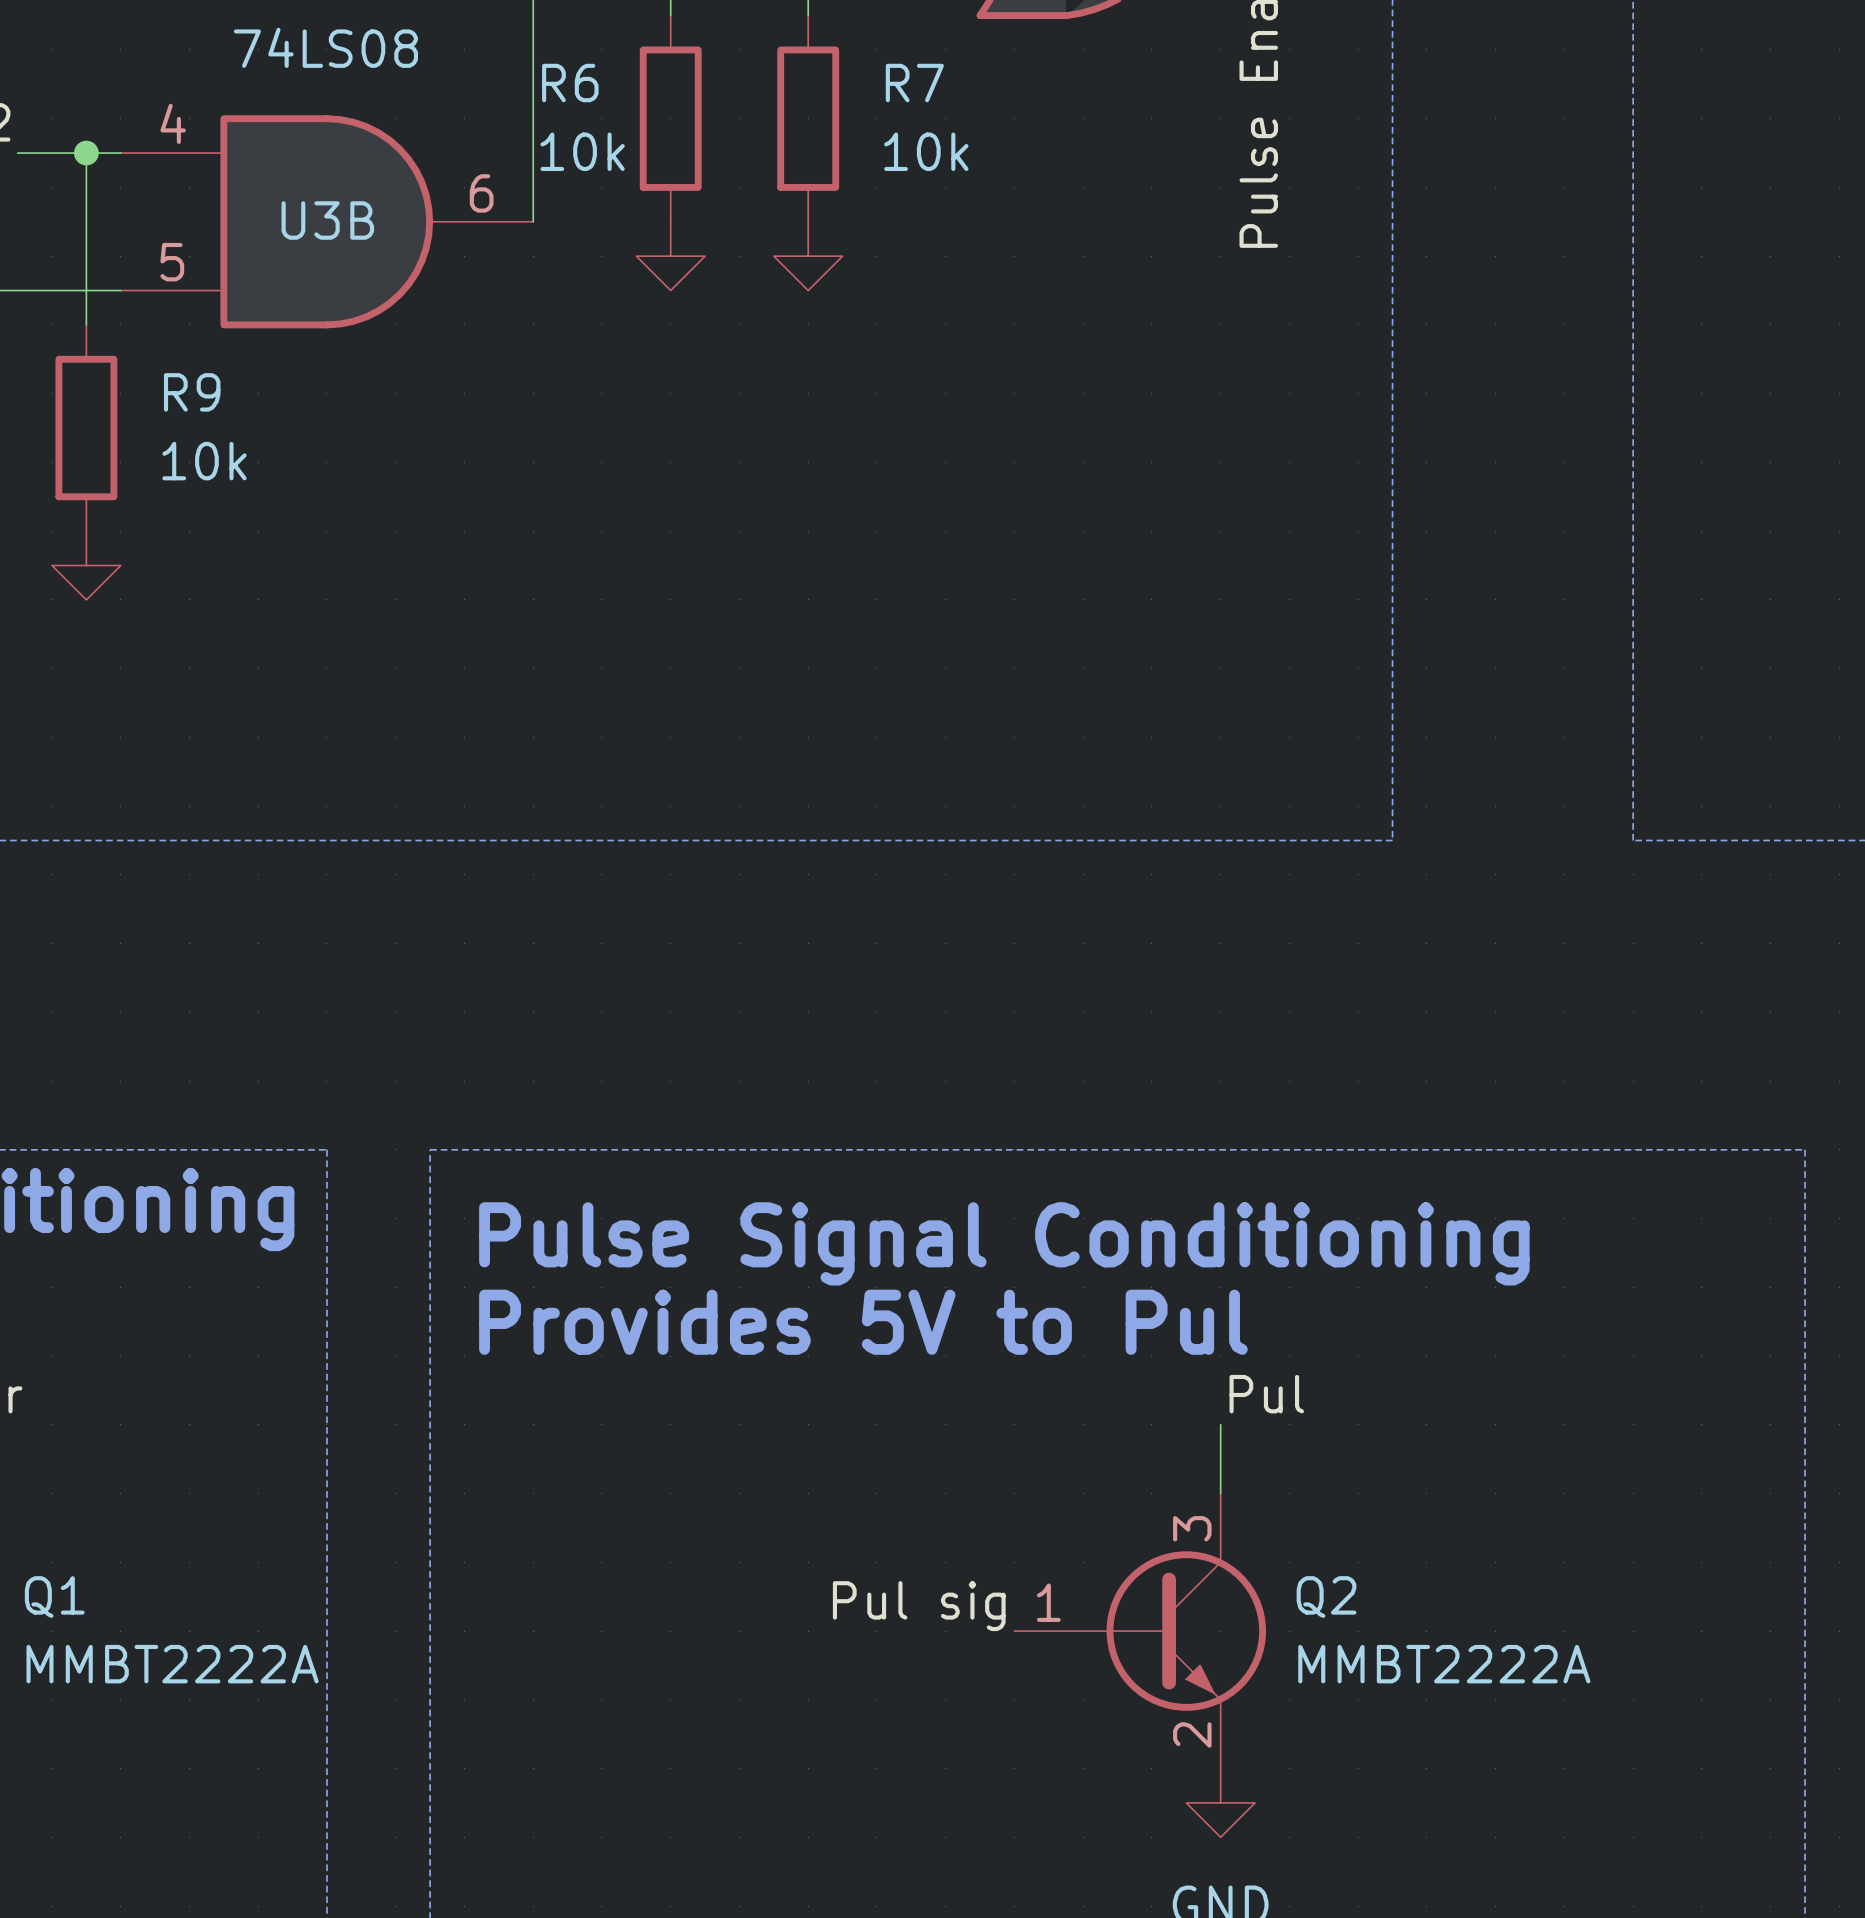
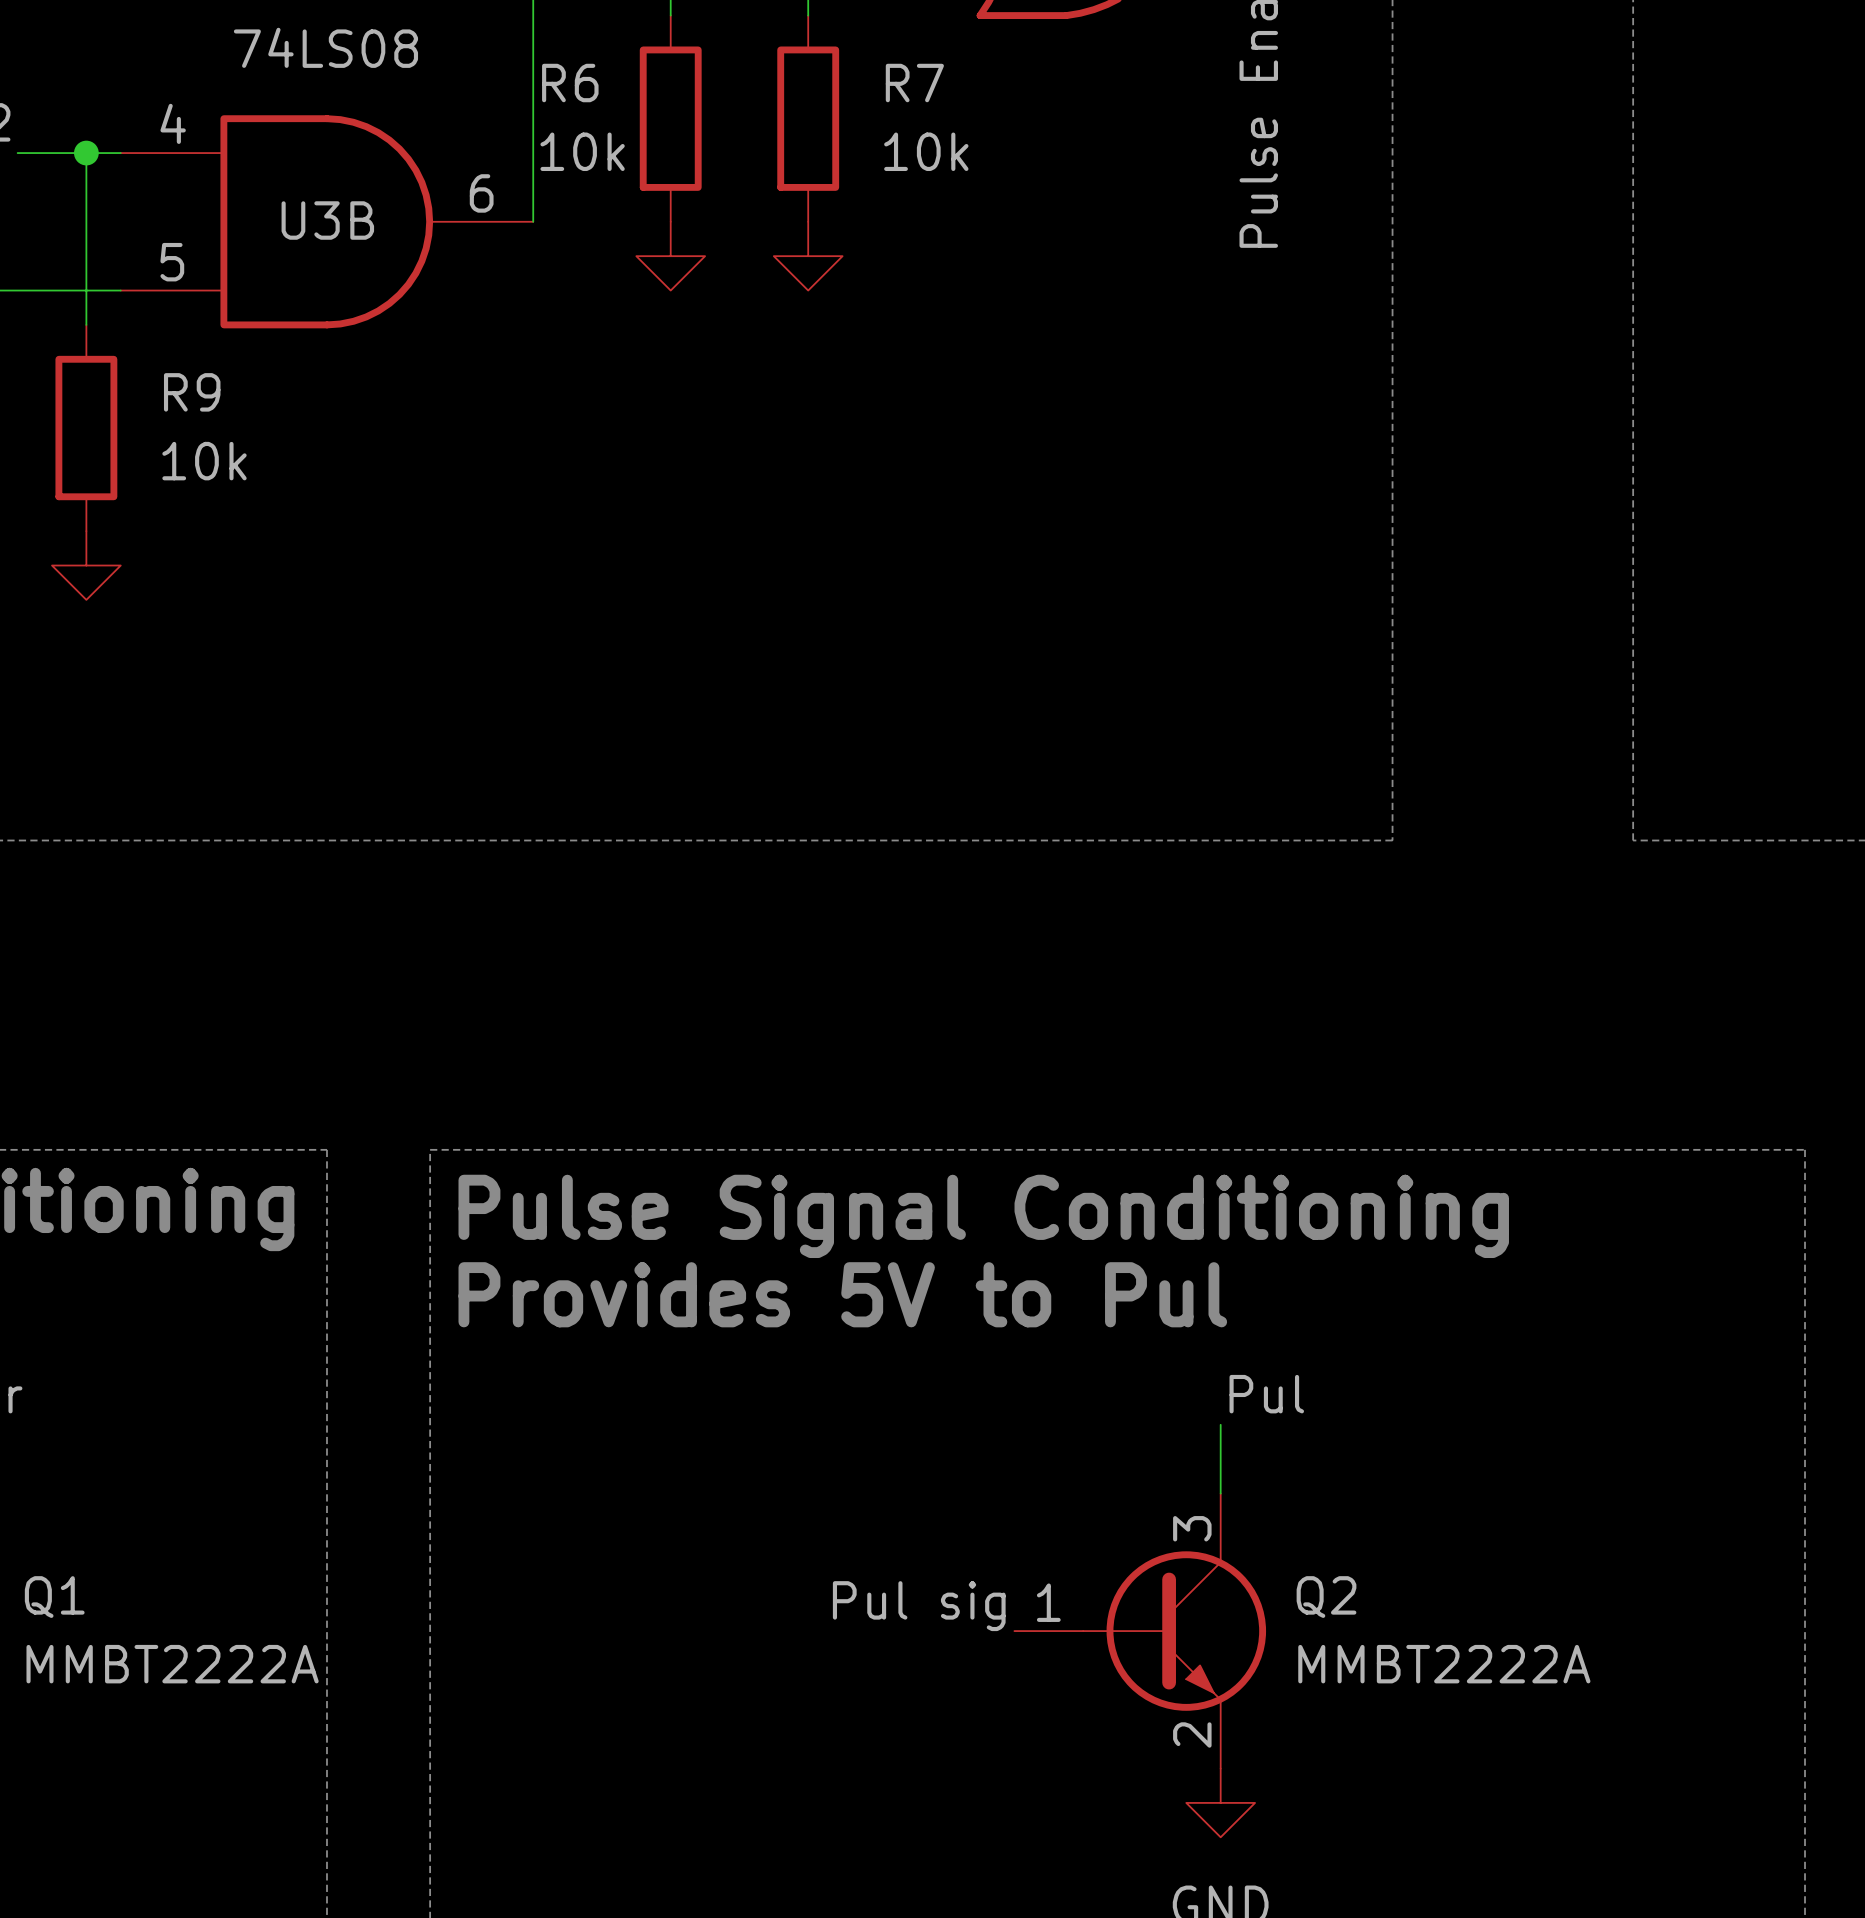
text position: Pulse Signal Conditioning (1004, 1243) -> Pulse Signal Conditioning (983, 1216)
text position: Provides 5V to Pul (863, 1322) -> Provides 5V to Pul (842, 1294)

